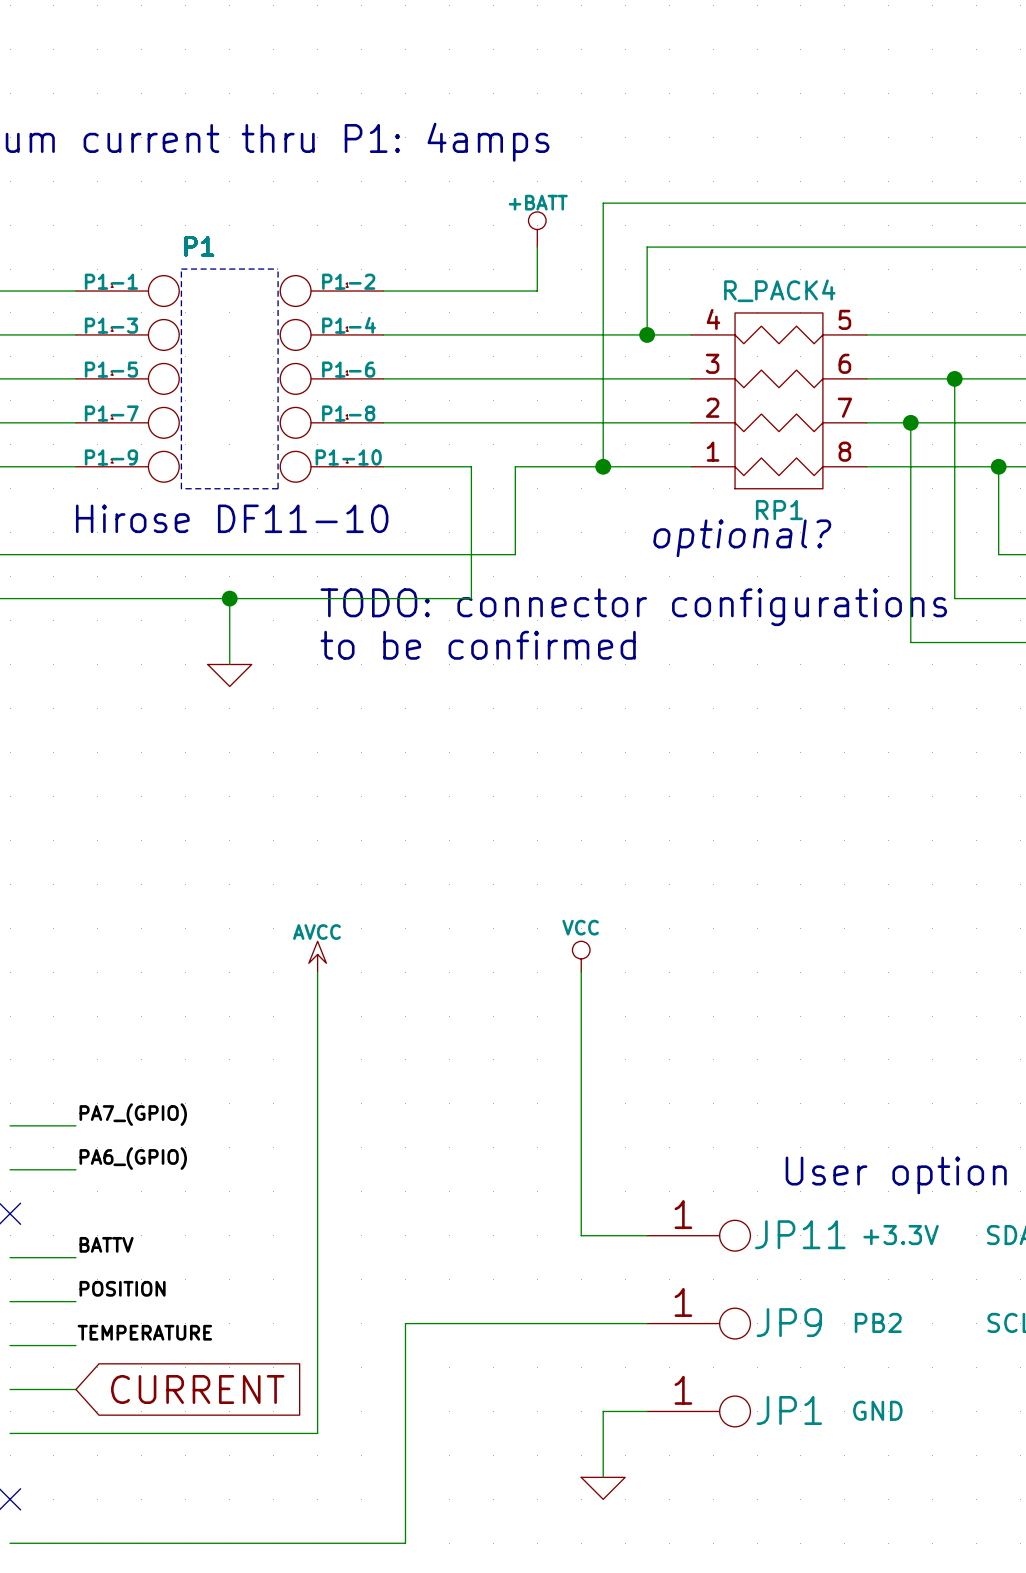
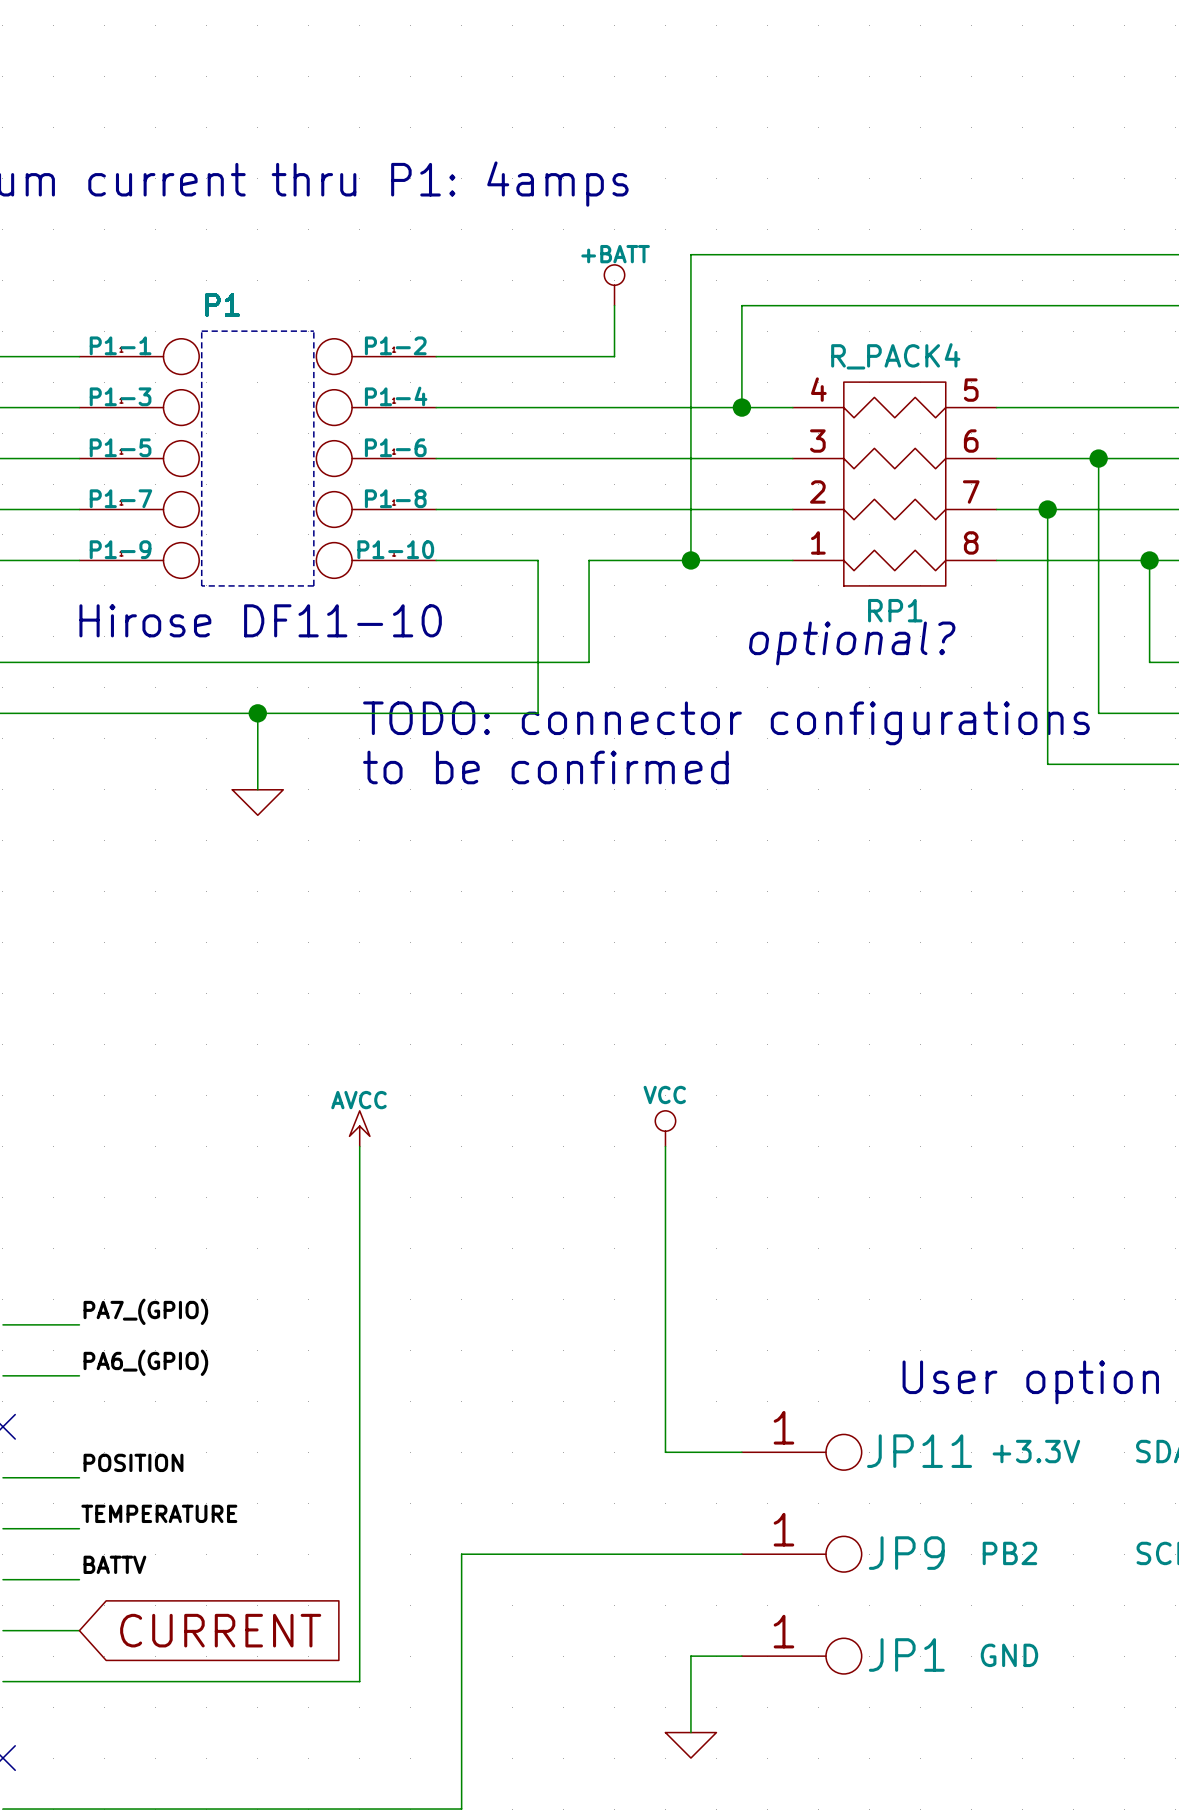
label: BATTV (106, 1244) -> POSITION (133, 1462)
label: POSITION (122, 1288) -> TEMPERATURE (159, 1513)
label: TEMPERATURE (144, 1332) -> BATTV (114, 1564)

